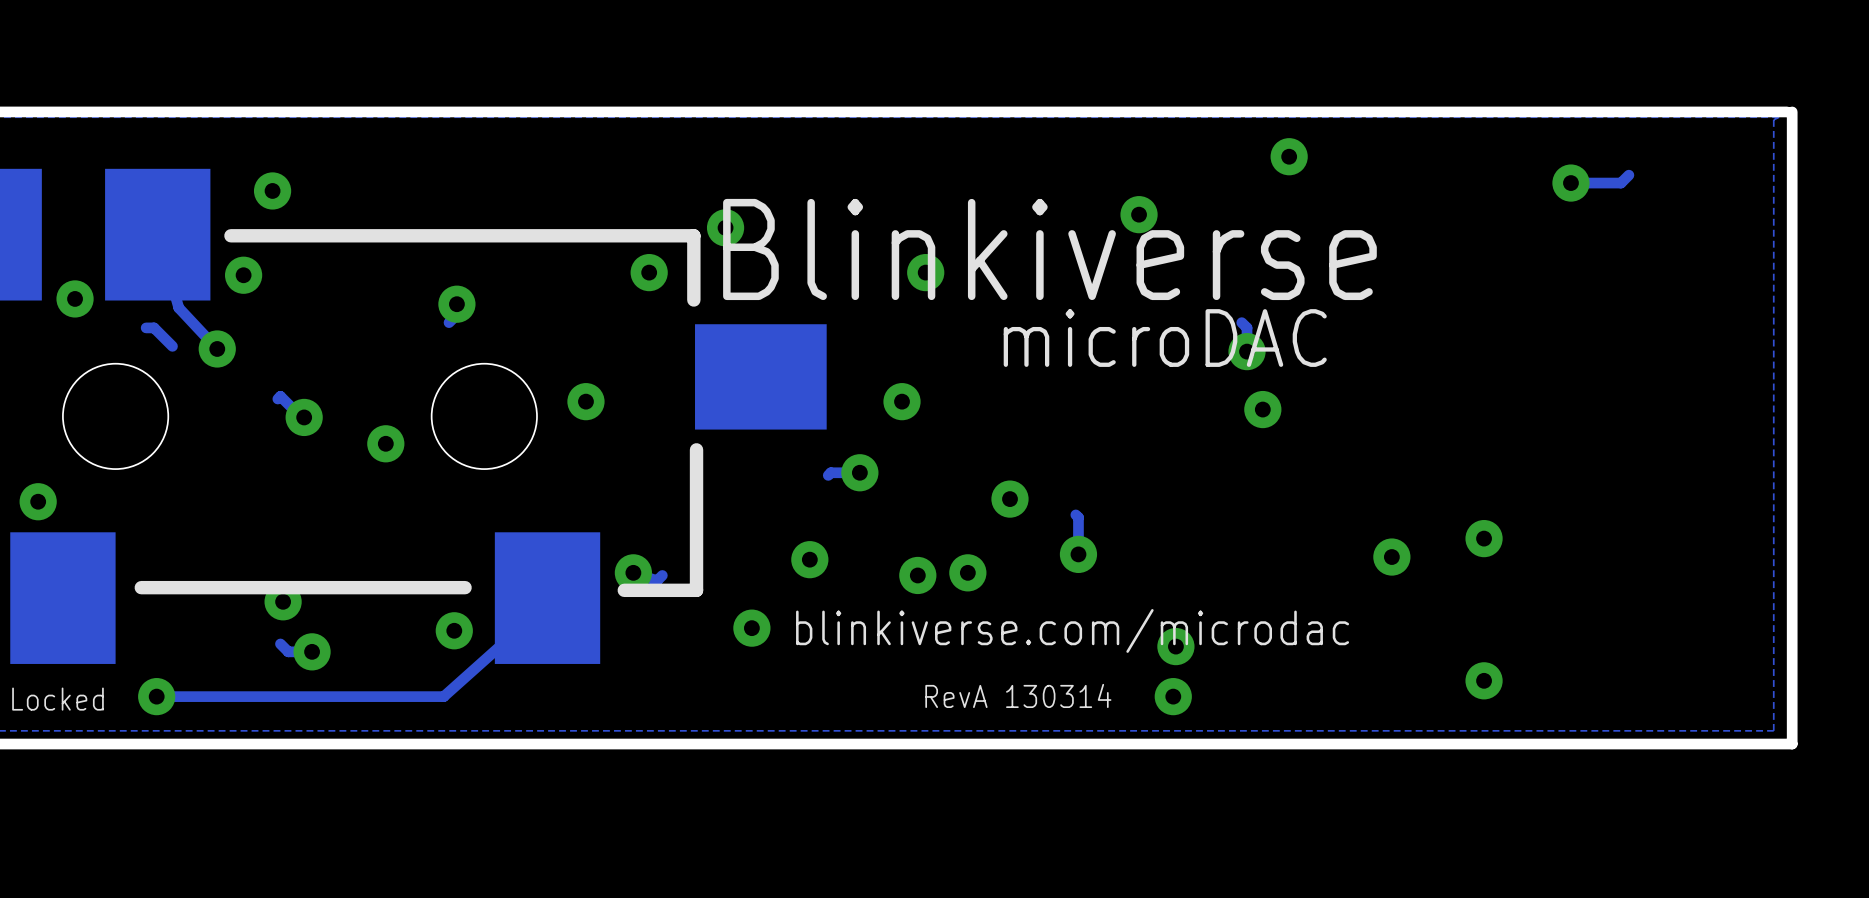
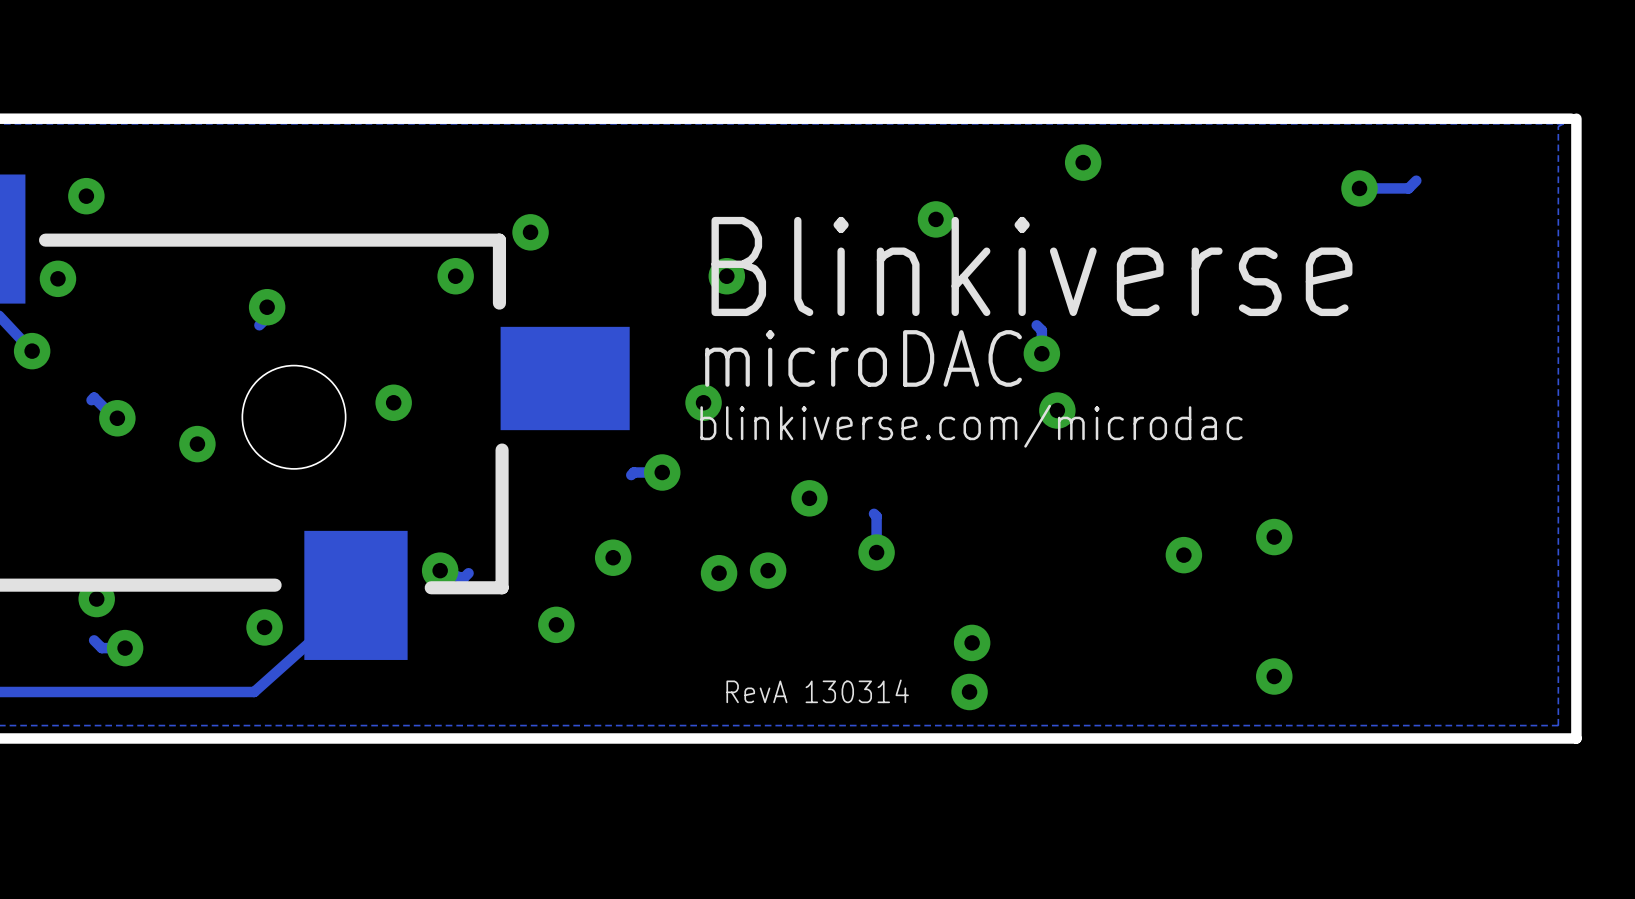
text position: Blinkiverse (1049, 249) -> Blinkiverse (1031, 266)
text position: microDAC (1165, 338) -> microDAC (863, 358)
text position: blinkiverse.com/microdac (1072, 630) -> blinkiverse.com/microdac (971, 426)

